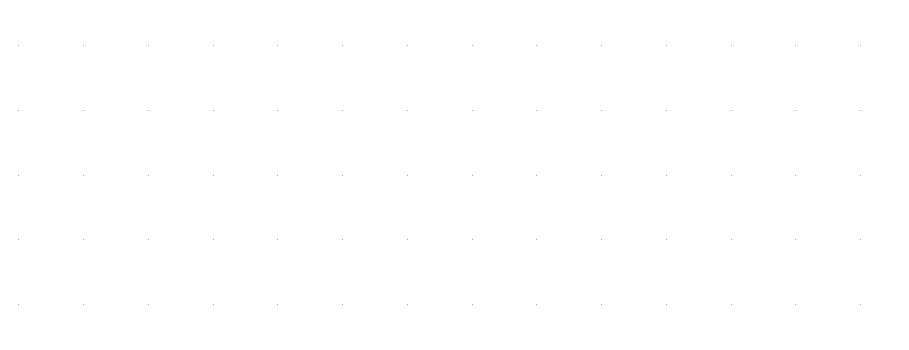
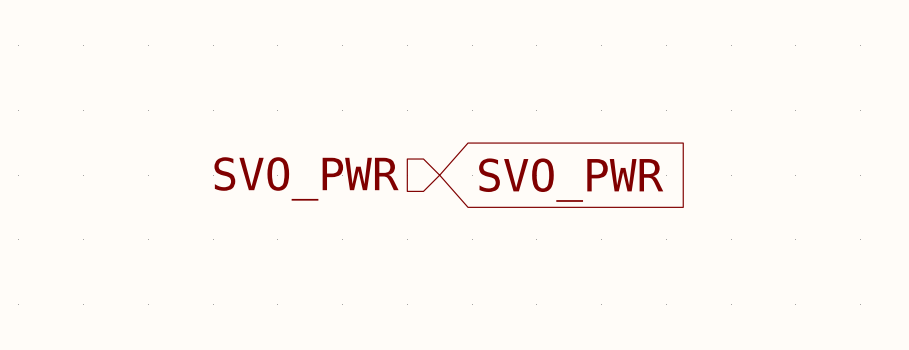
hierarchical label: none -> SVO_PWR (306, 178)
global label: none -> SVO_PWR (571, 180)

